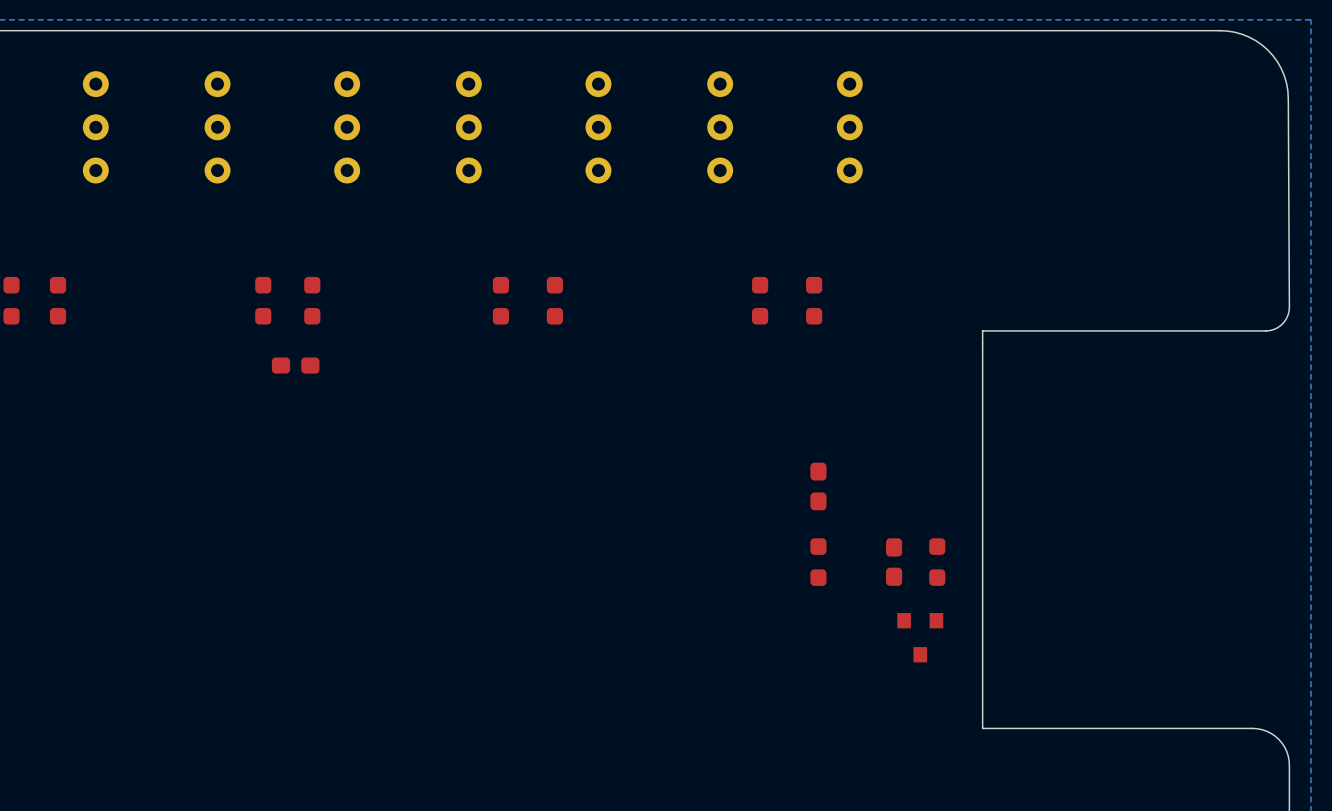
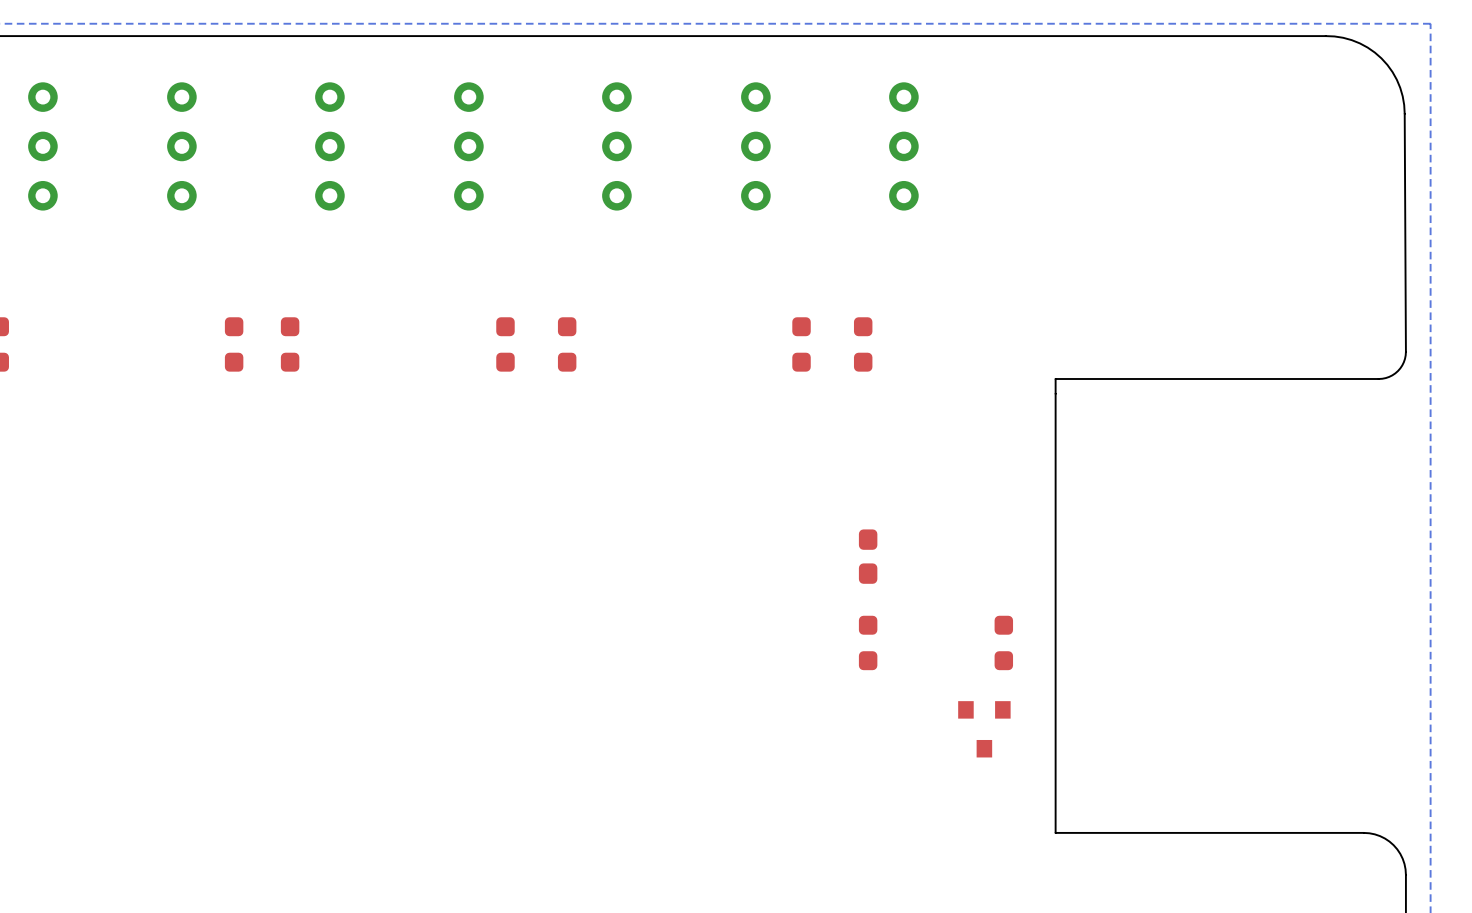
part: (295, 365) -> none
part: (894, 562) -> none

